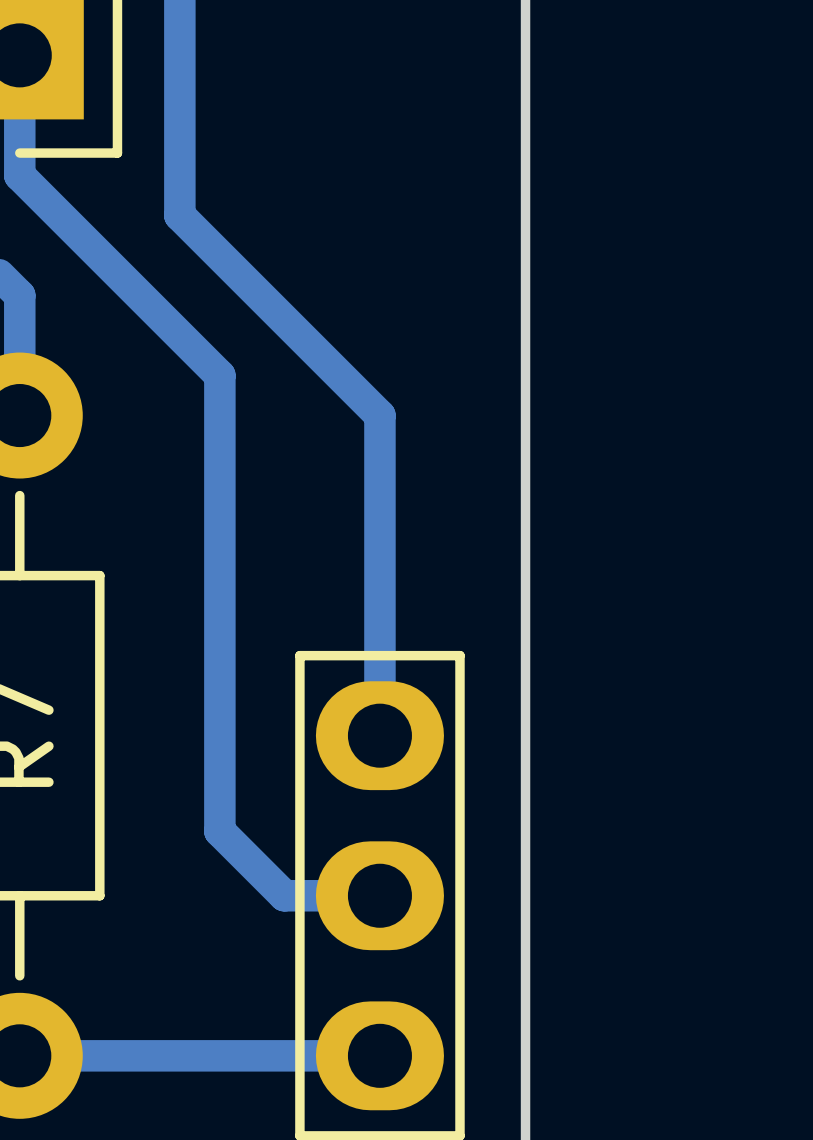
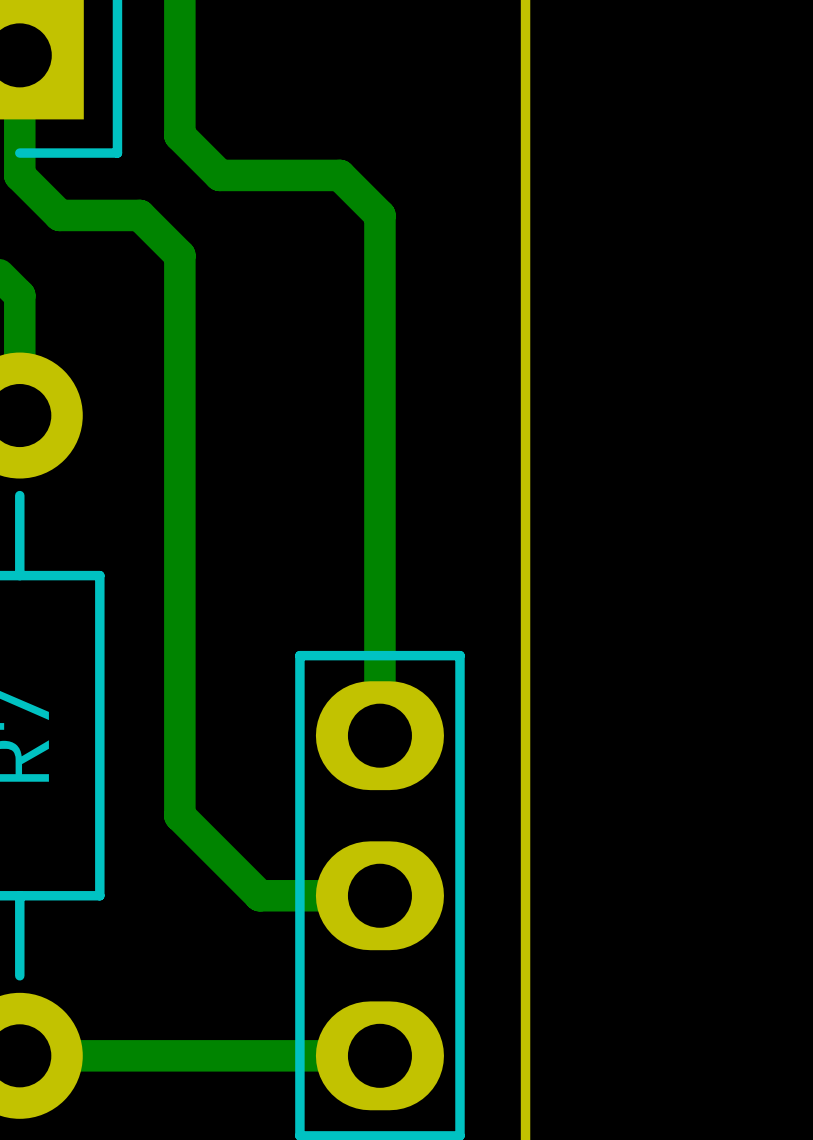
bottom track: (179, 135) (179, 215) (379, 415) -> (179, 135) (219, 175) (339, 175) (379, 215) (379, 415)
bottom track: (59, 215) (219, 375) (219, 831) (284, 895) -> (59, 215) (139, 215) (179, 255) (179, 815) (259, 895) (284, 895)

